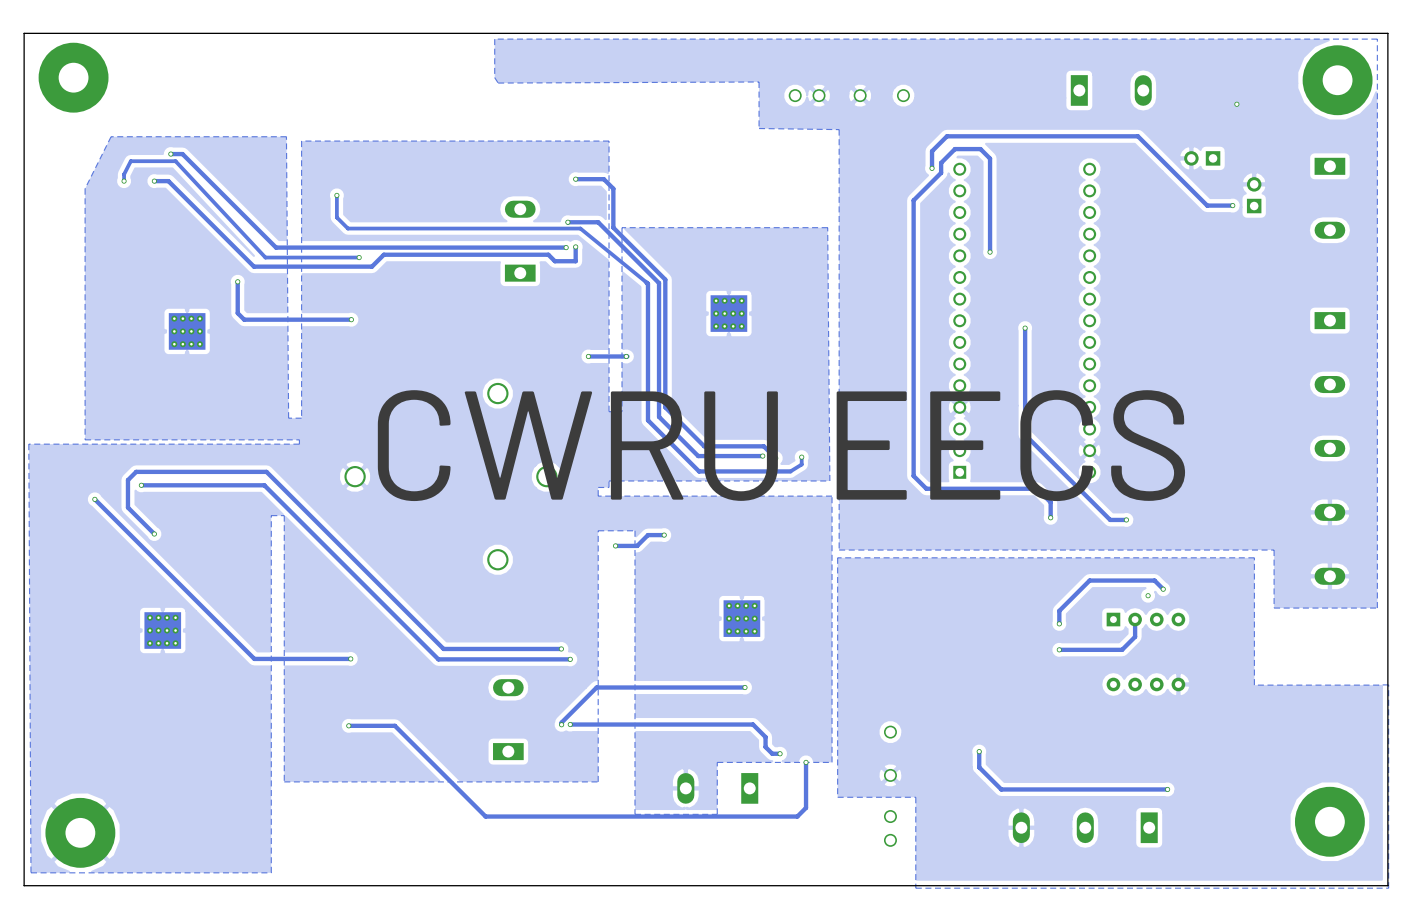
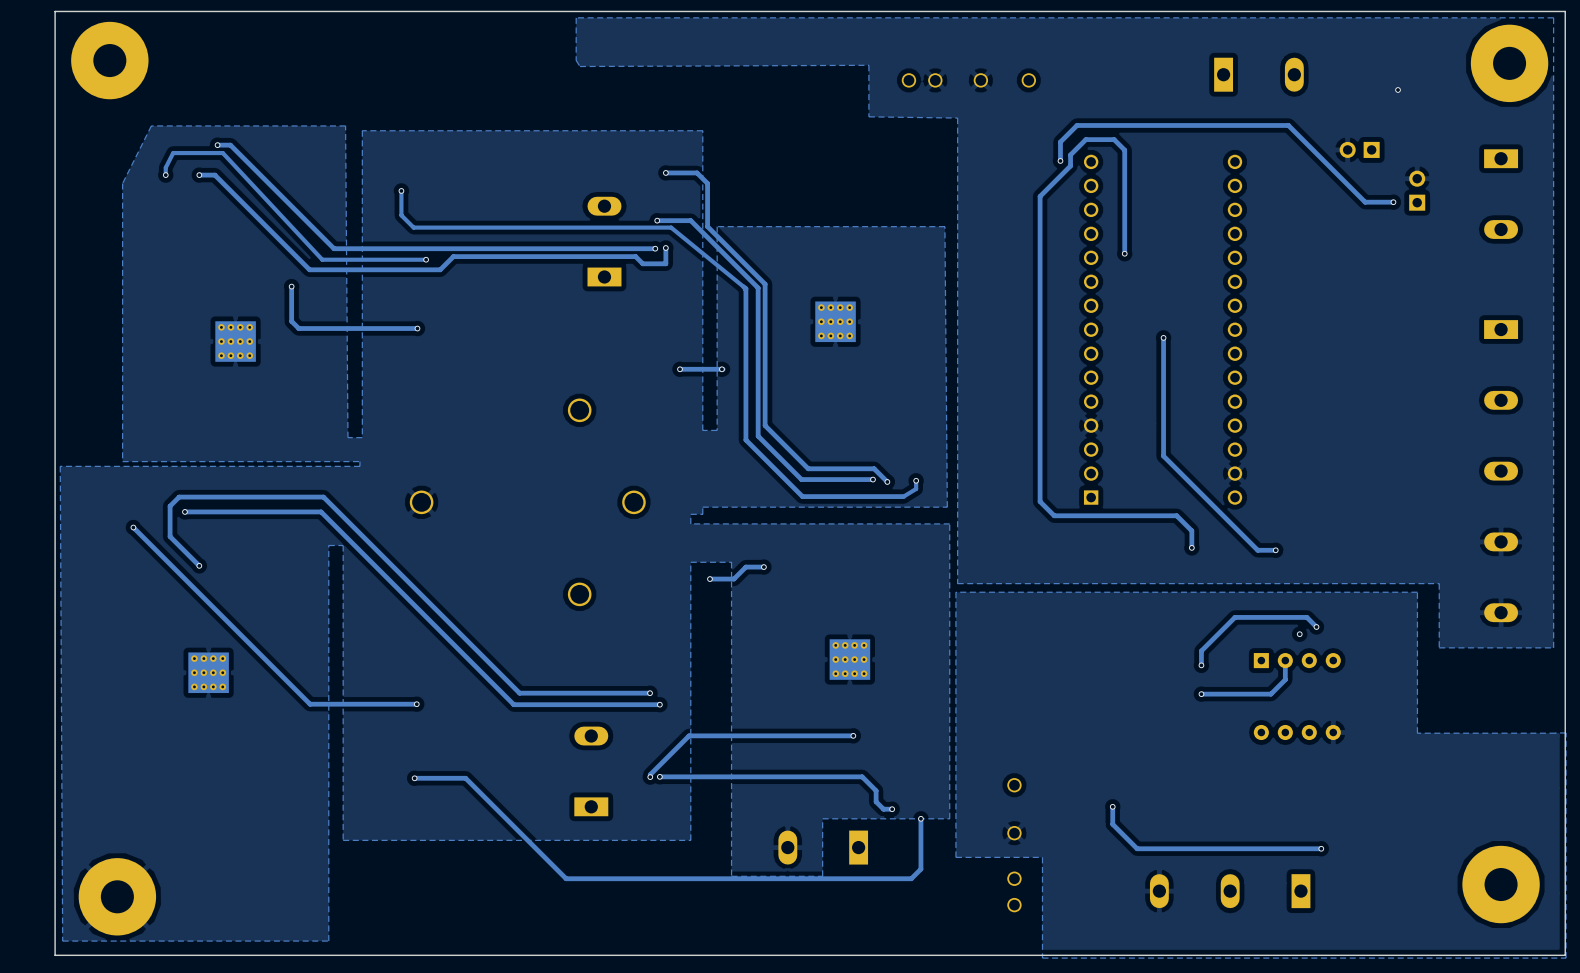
text: CWRU EECS (781, 445) -> none

